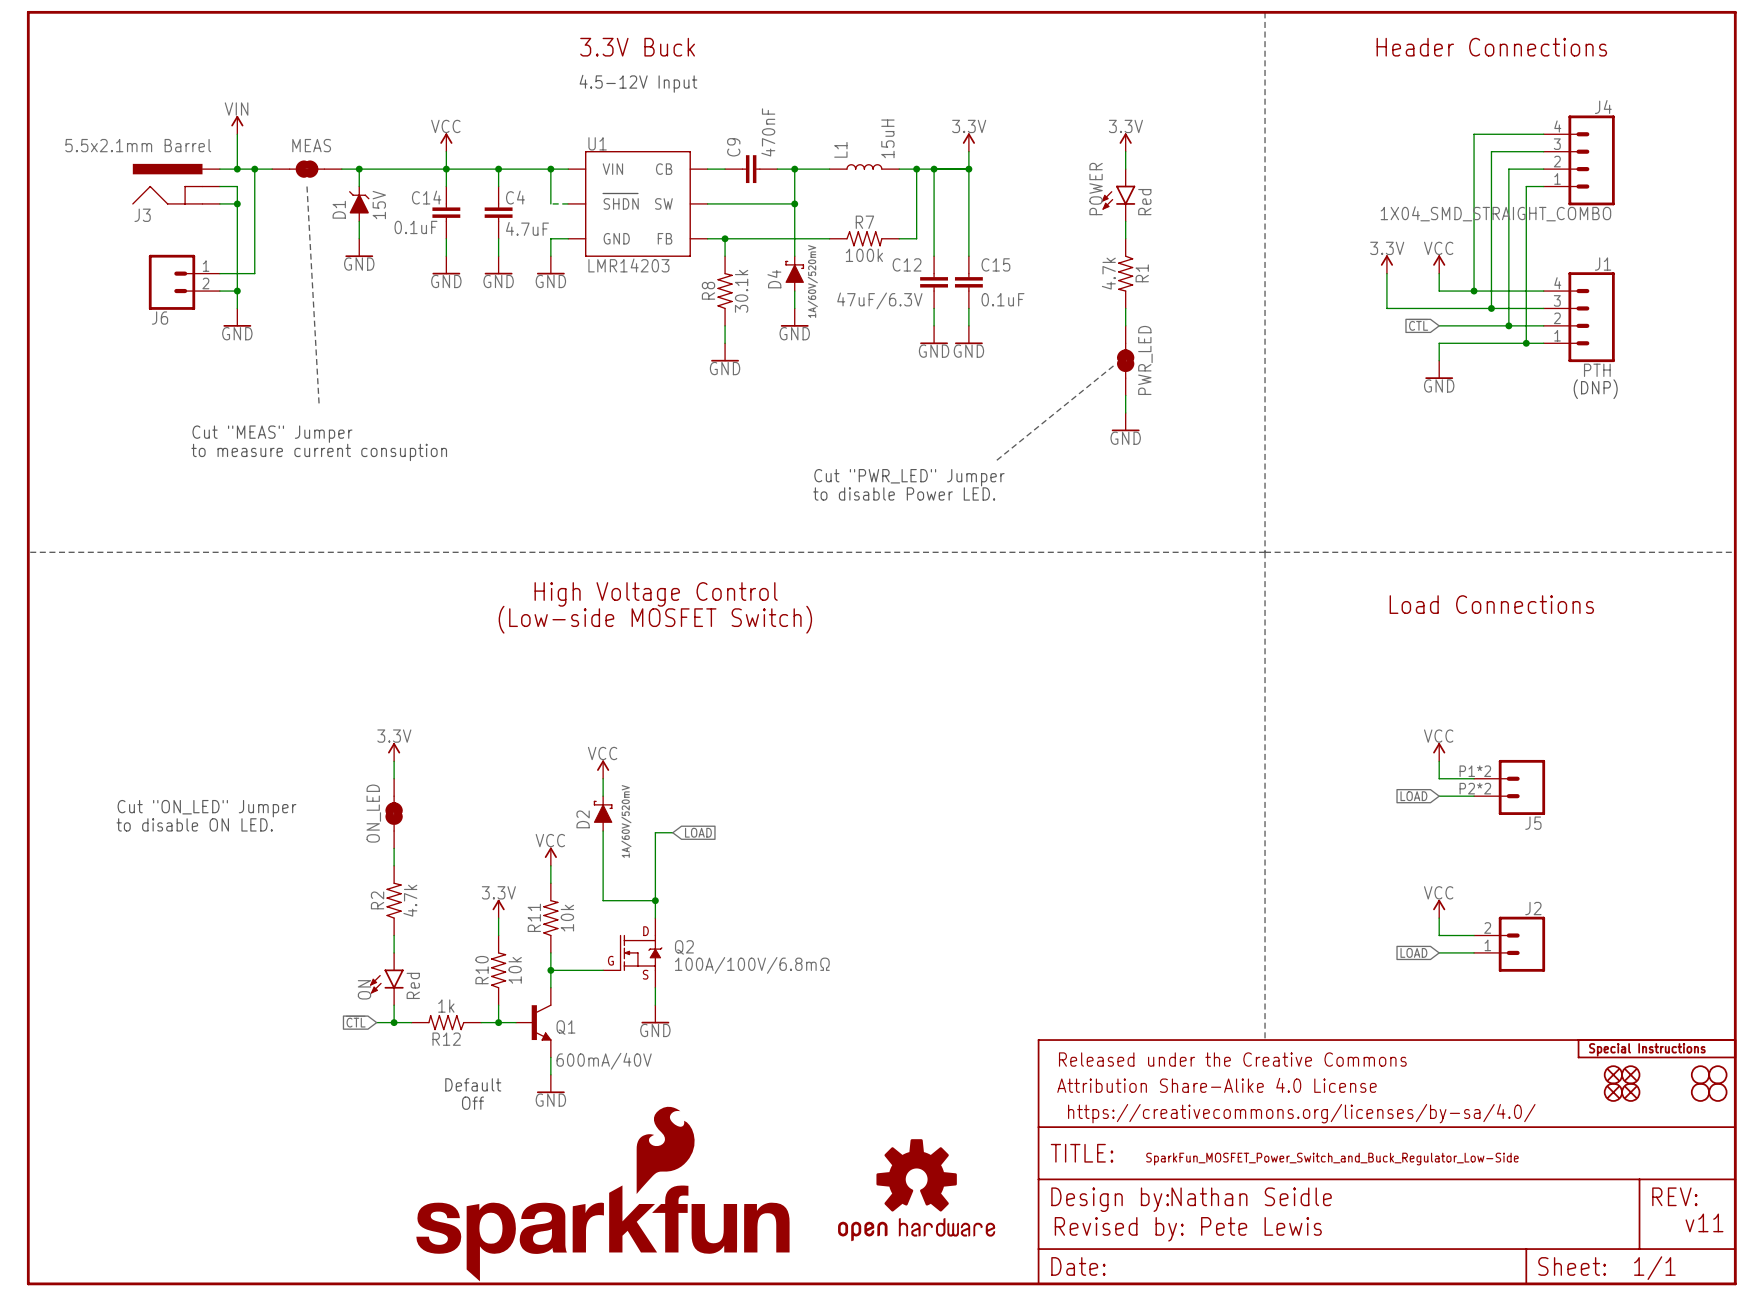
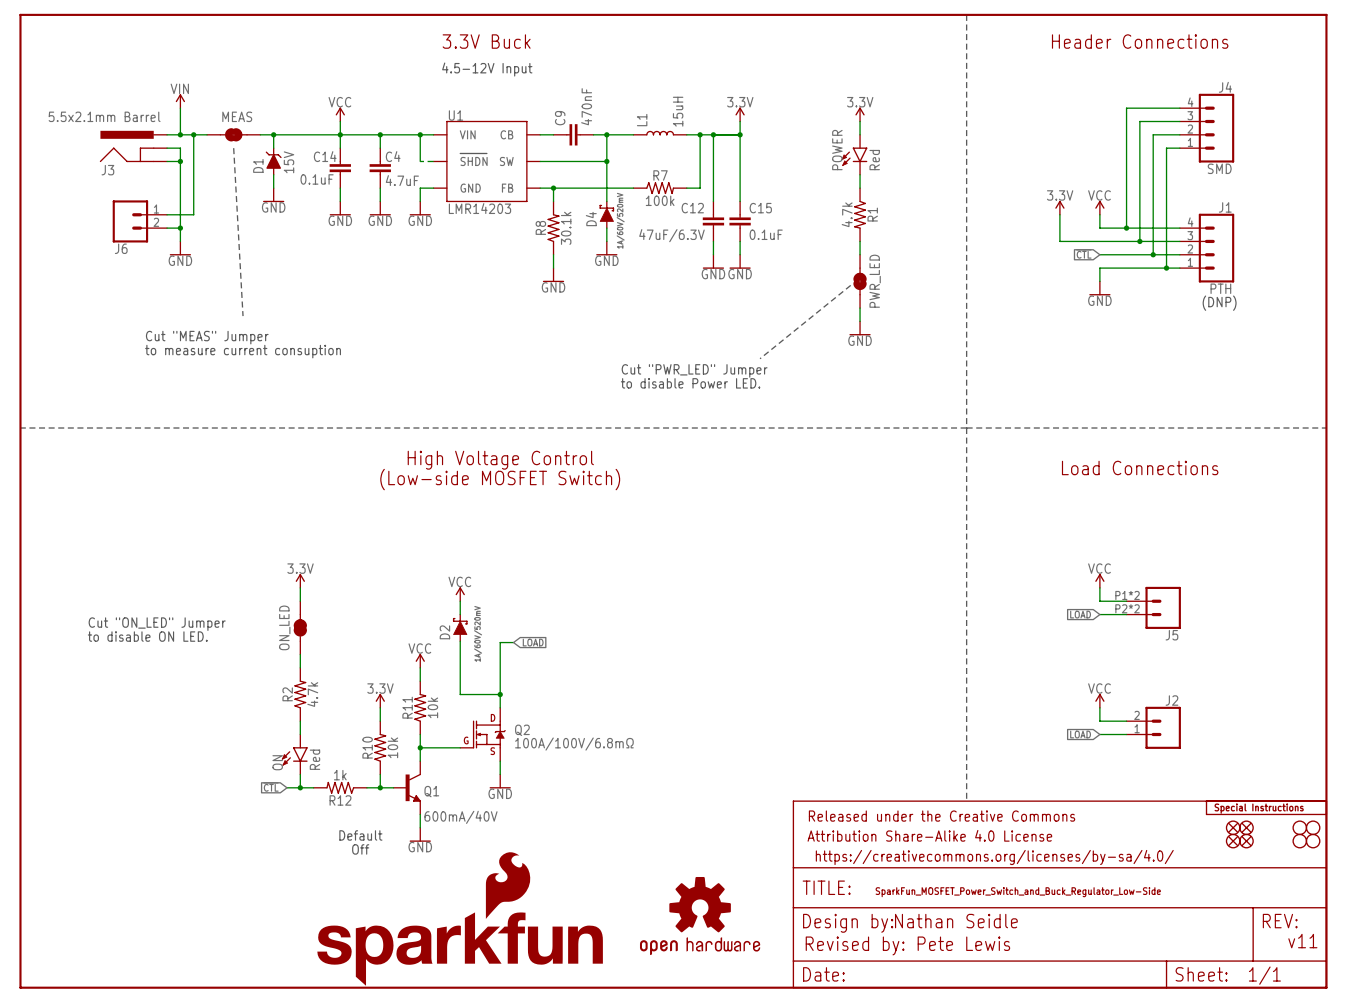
J4 value: 1X04_SMD_STRAIGHT_COMBO (1495, 213) -> SMD (1219, 168)

